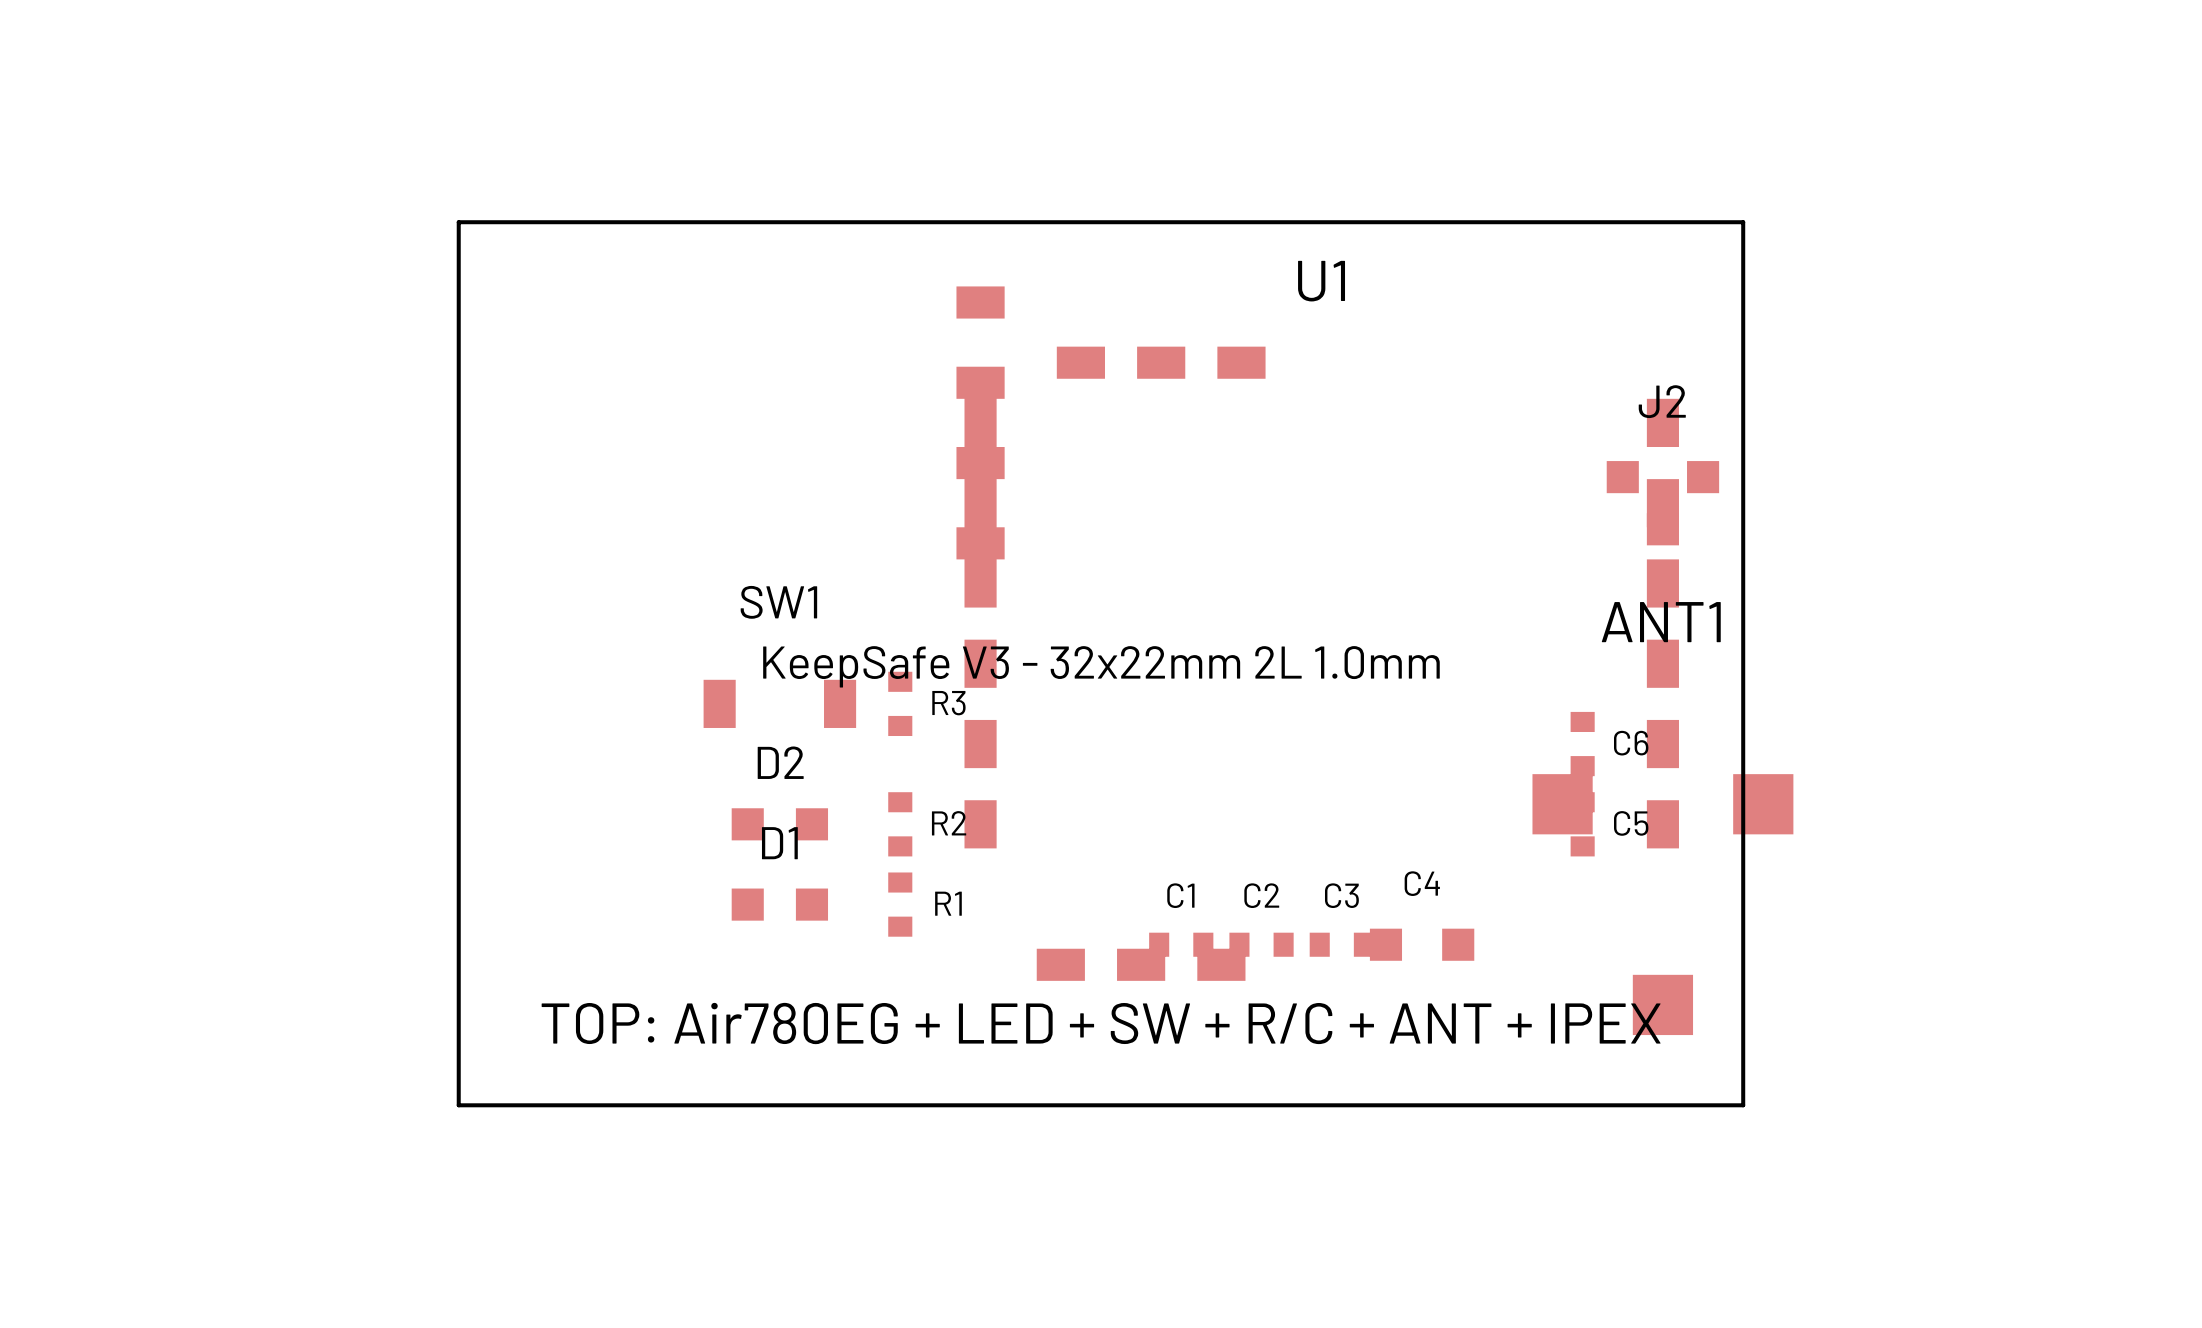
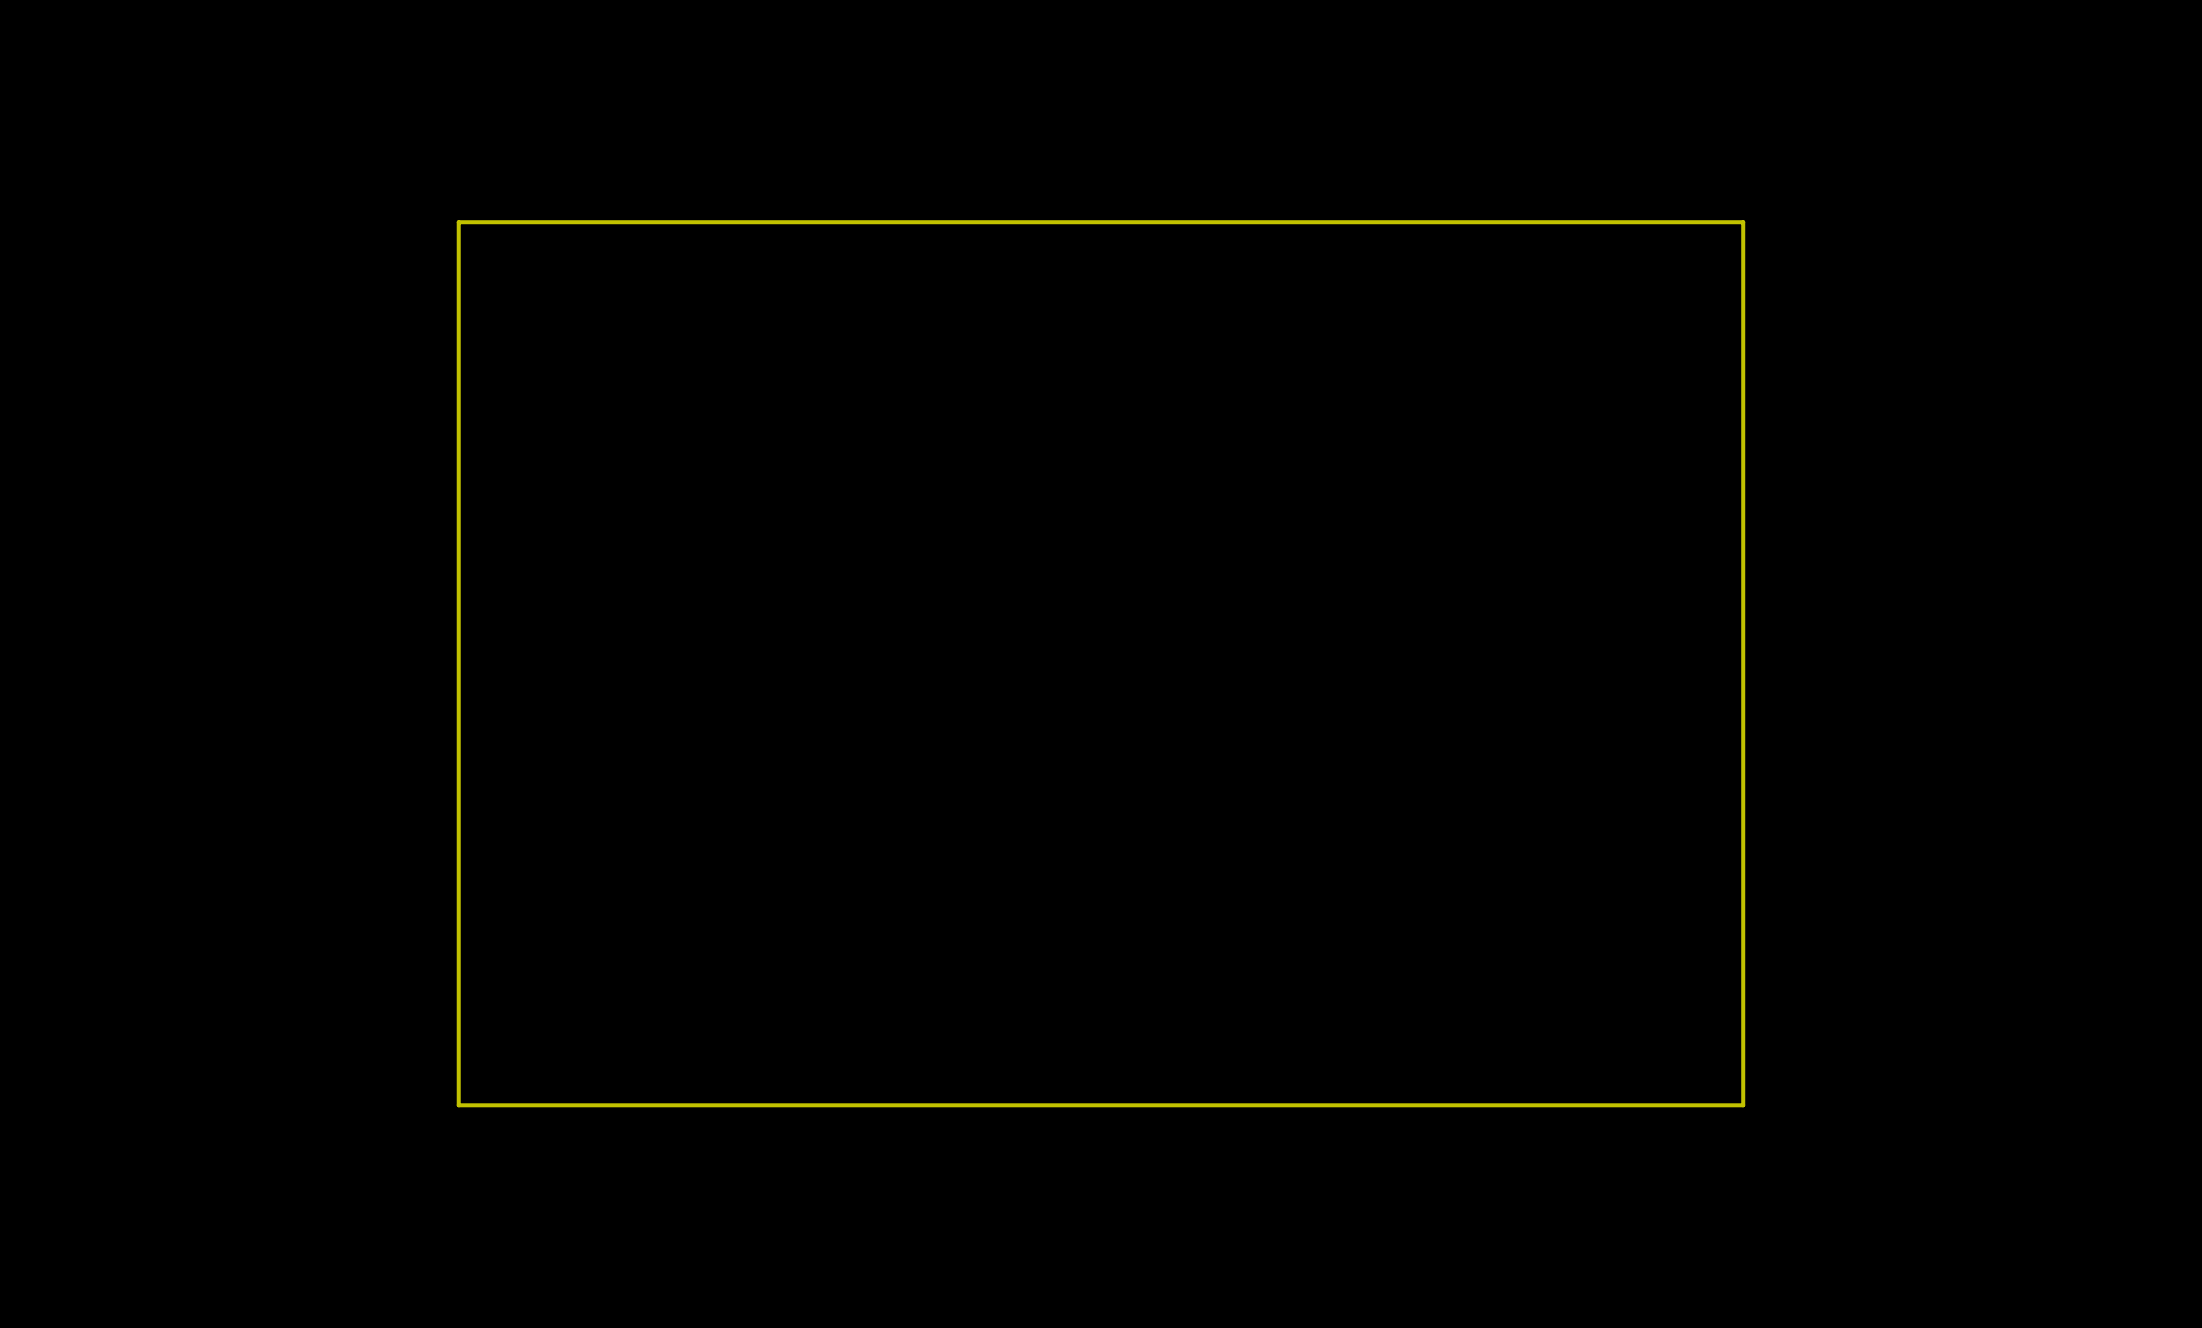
J2: (1662, 503) -> none
U1: (1317, 633) -> none
text: KeepSafe V3 - 32x22mm 2L 1.0mm (1101, 666) -> none
SW1: (779, 703) -> none
R3: (900, 703) -> none
C6: (1582, 744) -> none
D2: (779, 824) -> none
R2: (900, 824) -> none
C5: (1582, 824) -> none
D1: (779, 904) -> none
R1: (900, 904) -> none
ANT1: (1662, 904) -> none
C1: (1181, 944) -> none
C2: (1261, 944) -> none
C3: (1341, 944) -> none
C4: (1422, 944) -> none
text: TOP: Air780EG + LED + SW + R/C + ANT + IPEX (1101, 1023) -> none

